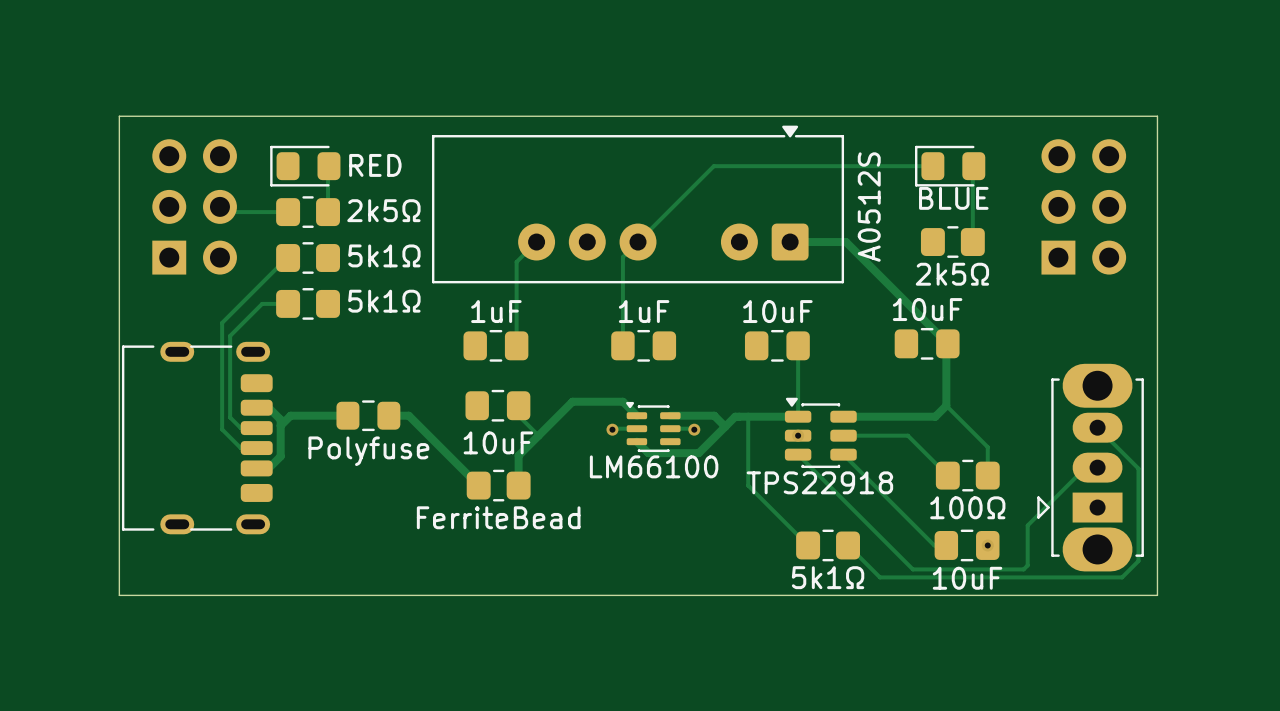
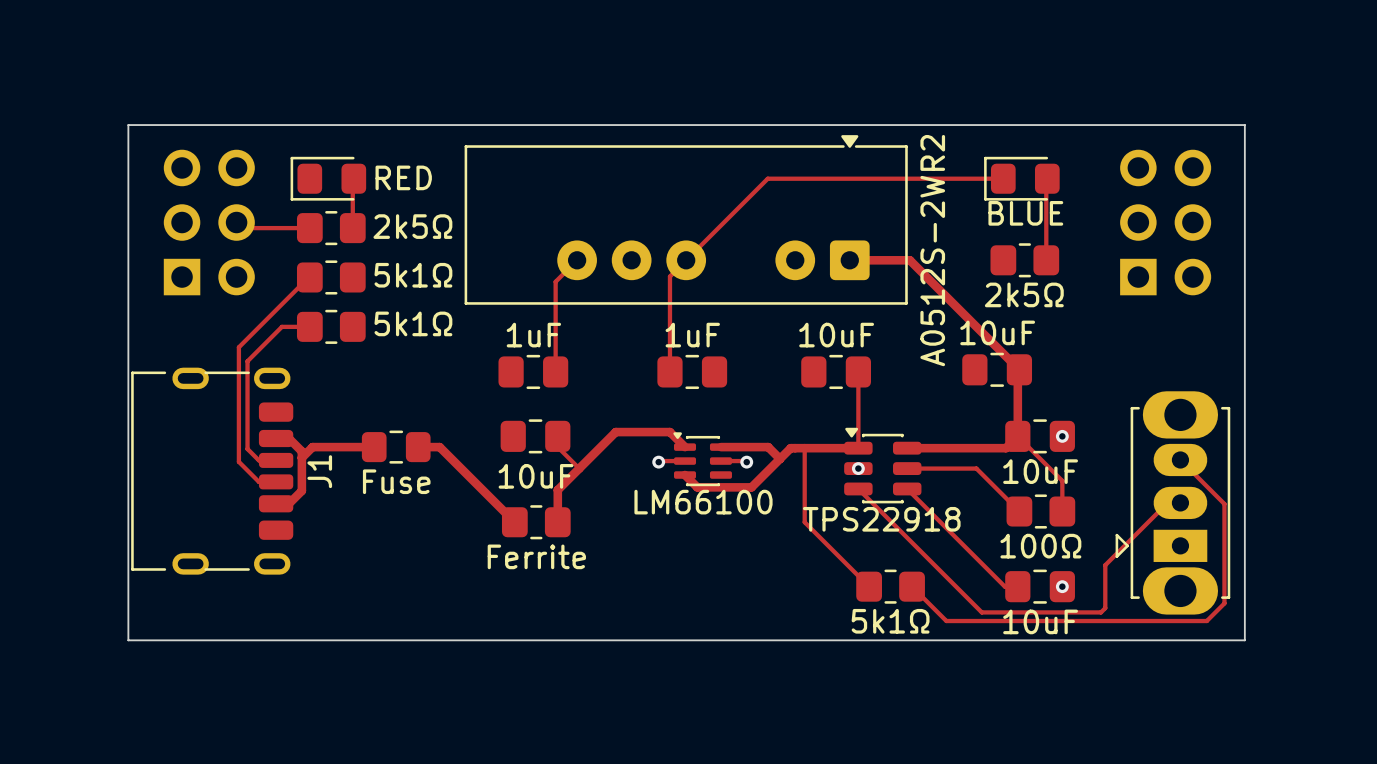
part value: A0512S (869, 207) -> A0512S-2WR2 (932, 250)
part: none -> 10uF (1040, 436)
via: none -> (1062, 436)
J1 name: none -> J1 (319, 471)
part value: Polyfuse (368, 451) -> Fuse (396, 481)
part value: FerriteBead (498, 517) -> Ferrite (536, 556)

